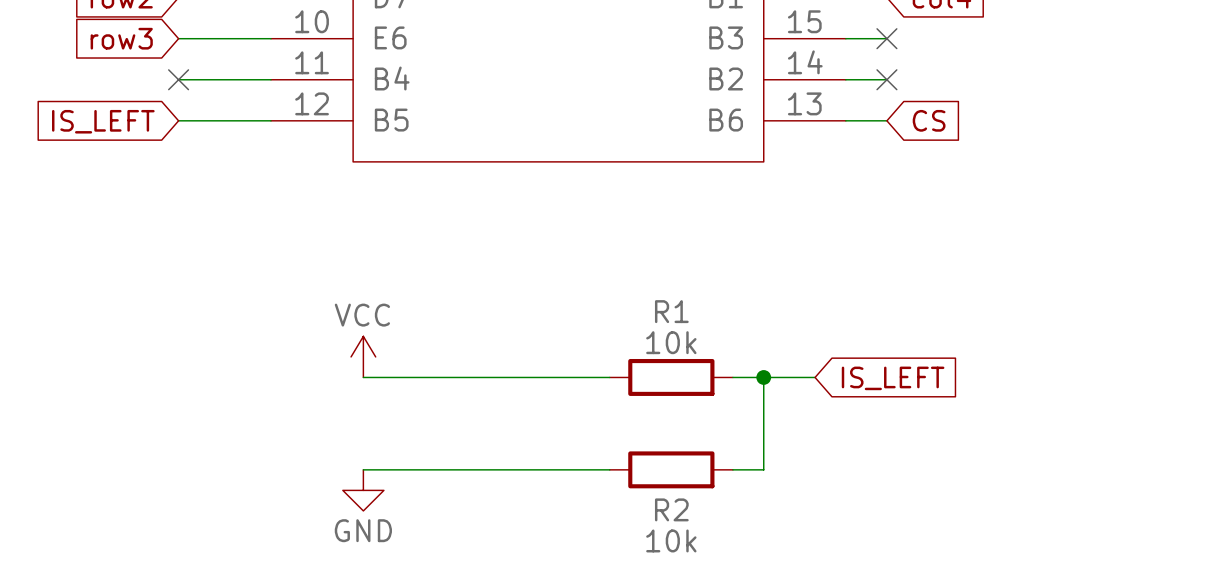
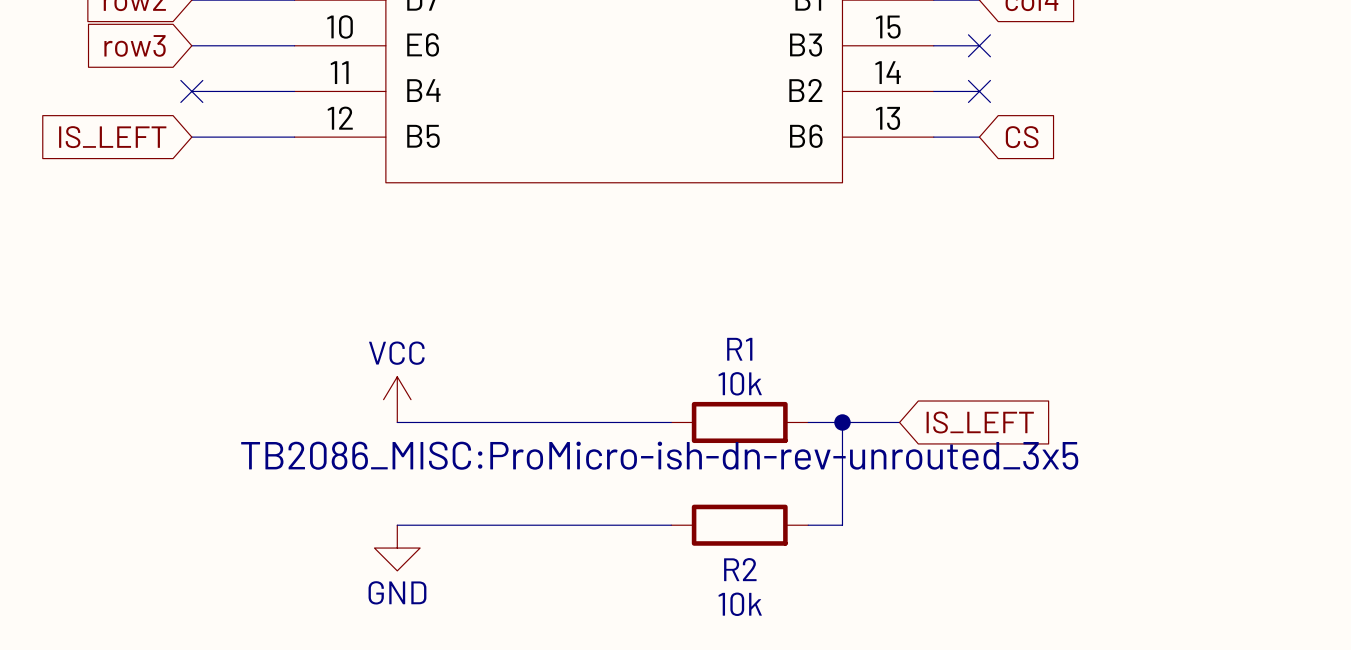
part text: none -> TB2086_MISC:ProMicro-ish-dn-rev-unrouted_3x5 (659, 455)

